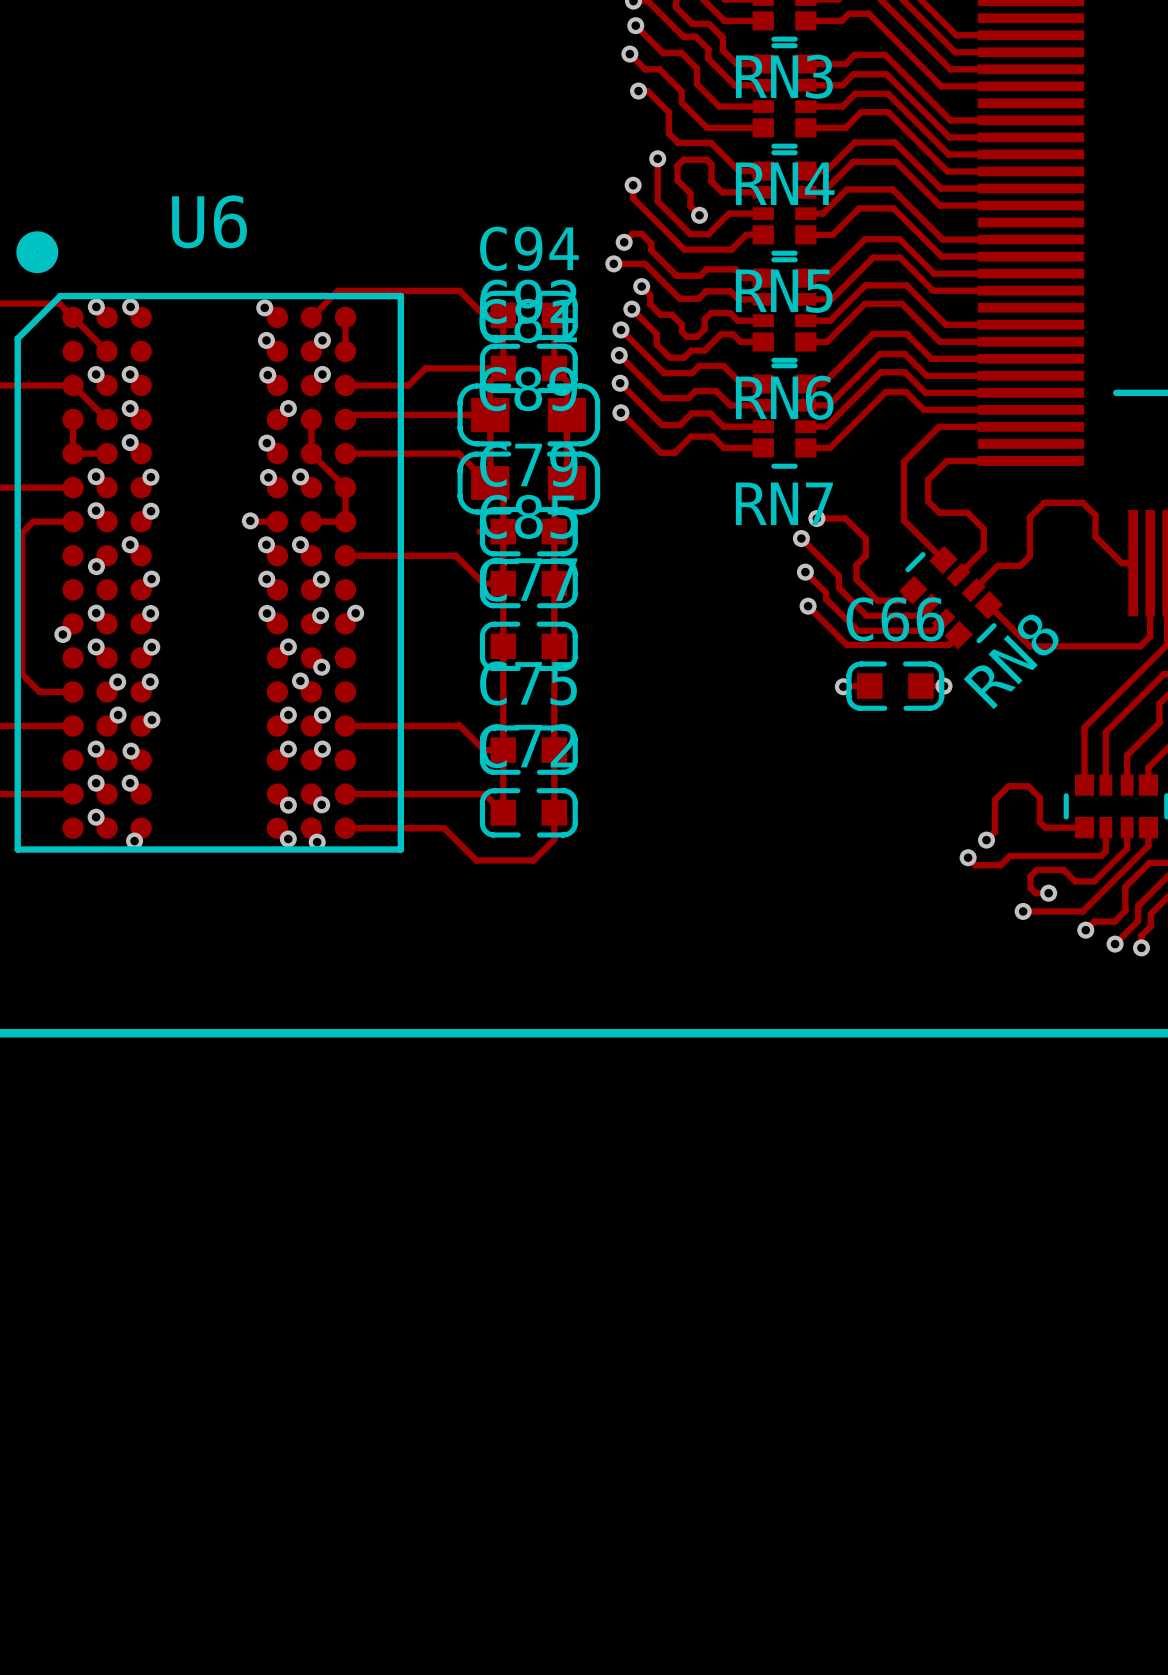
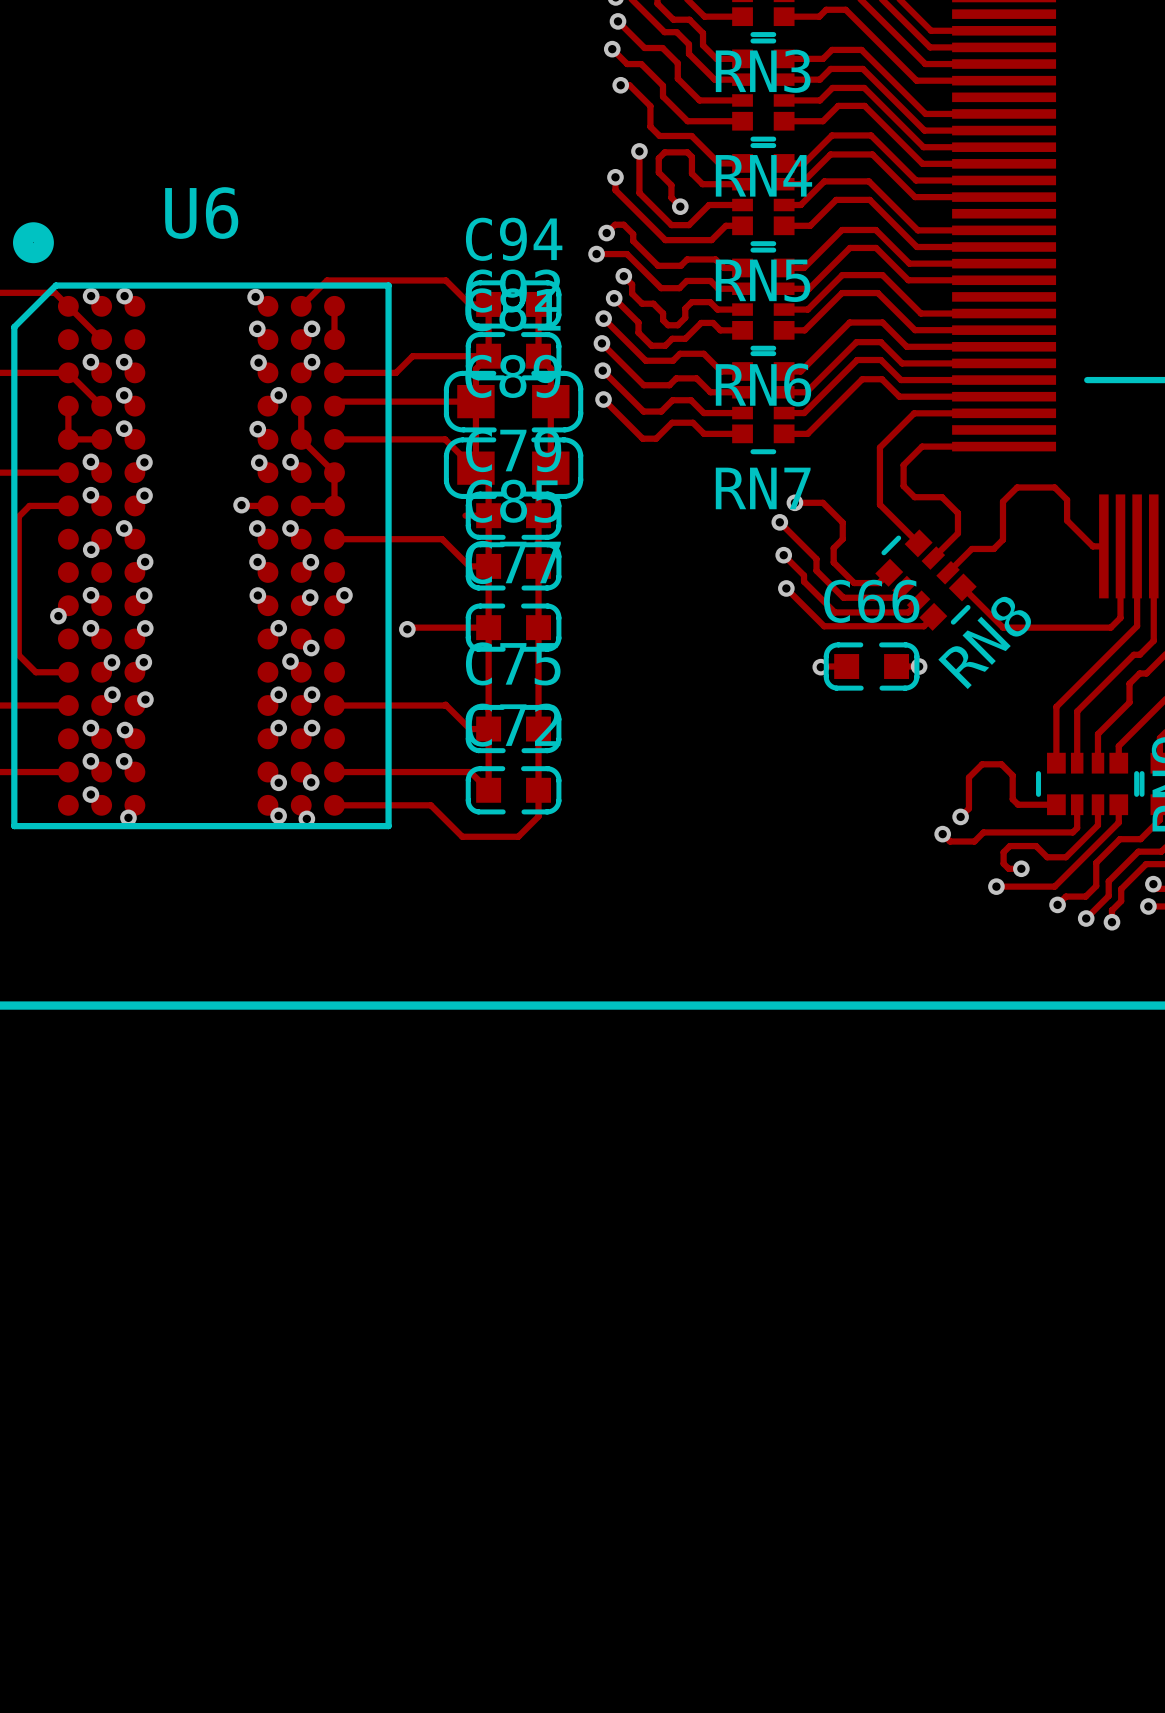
track: none -> (488, 627) (408, 627) (407, 629)
via: none -> (407, 629)

